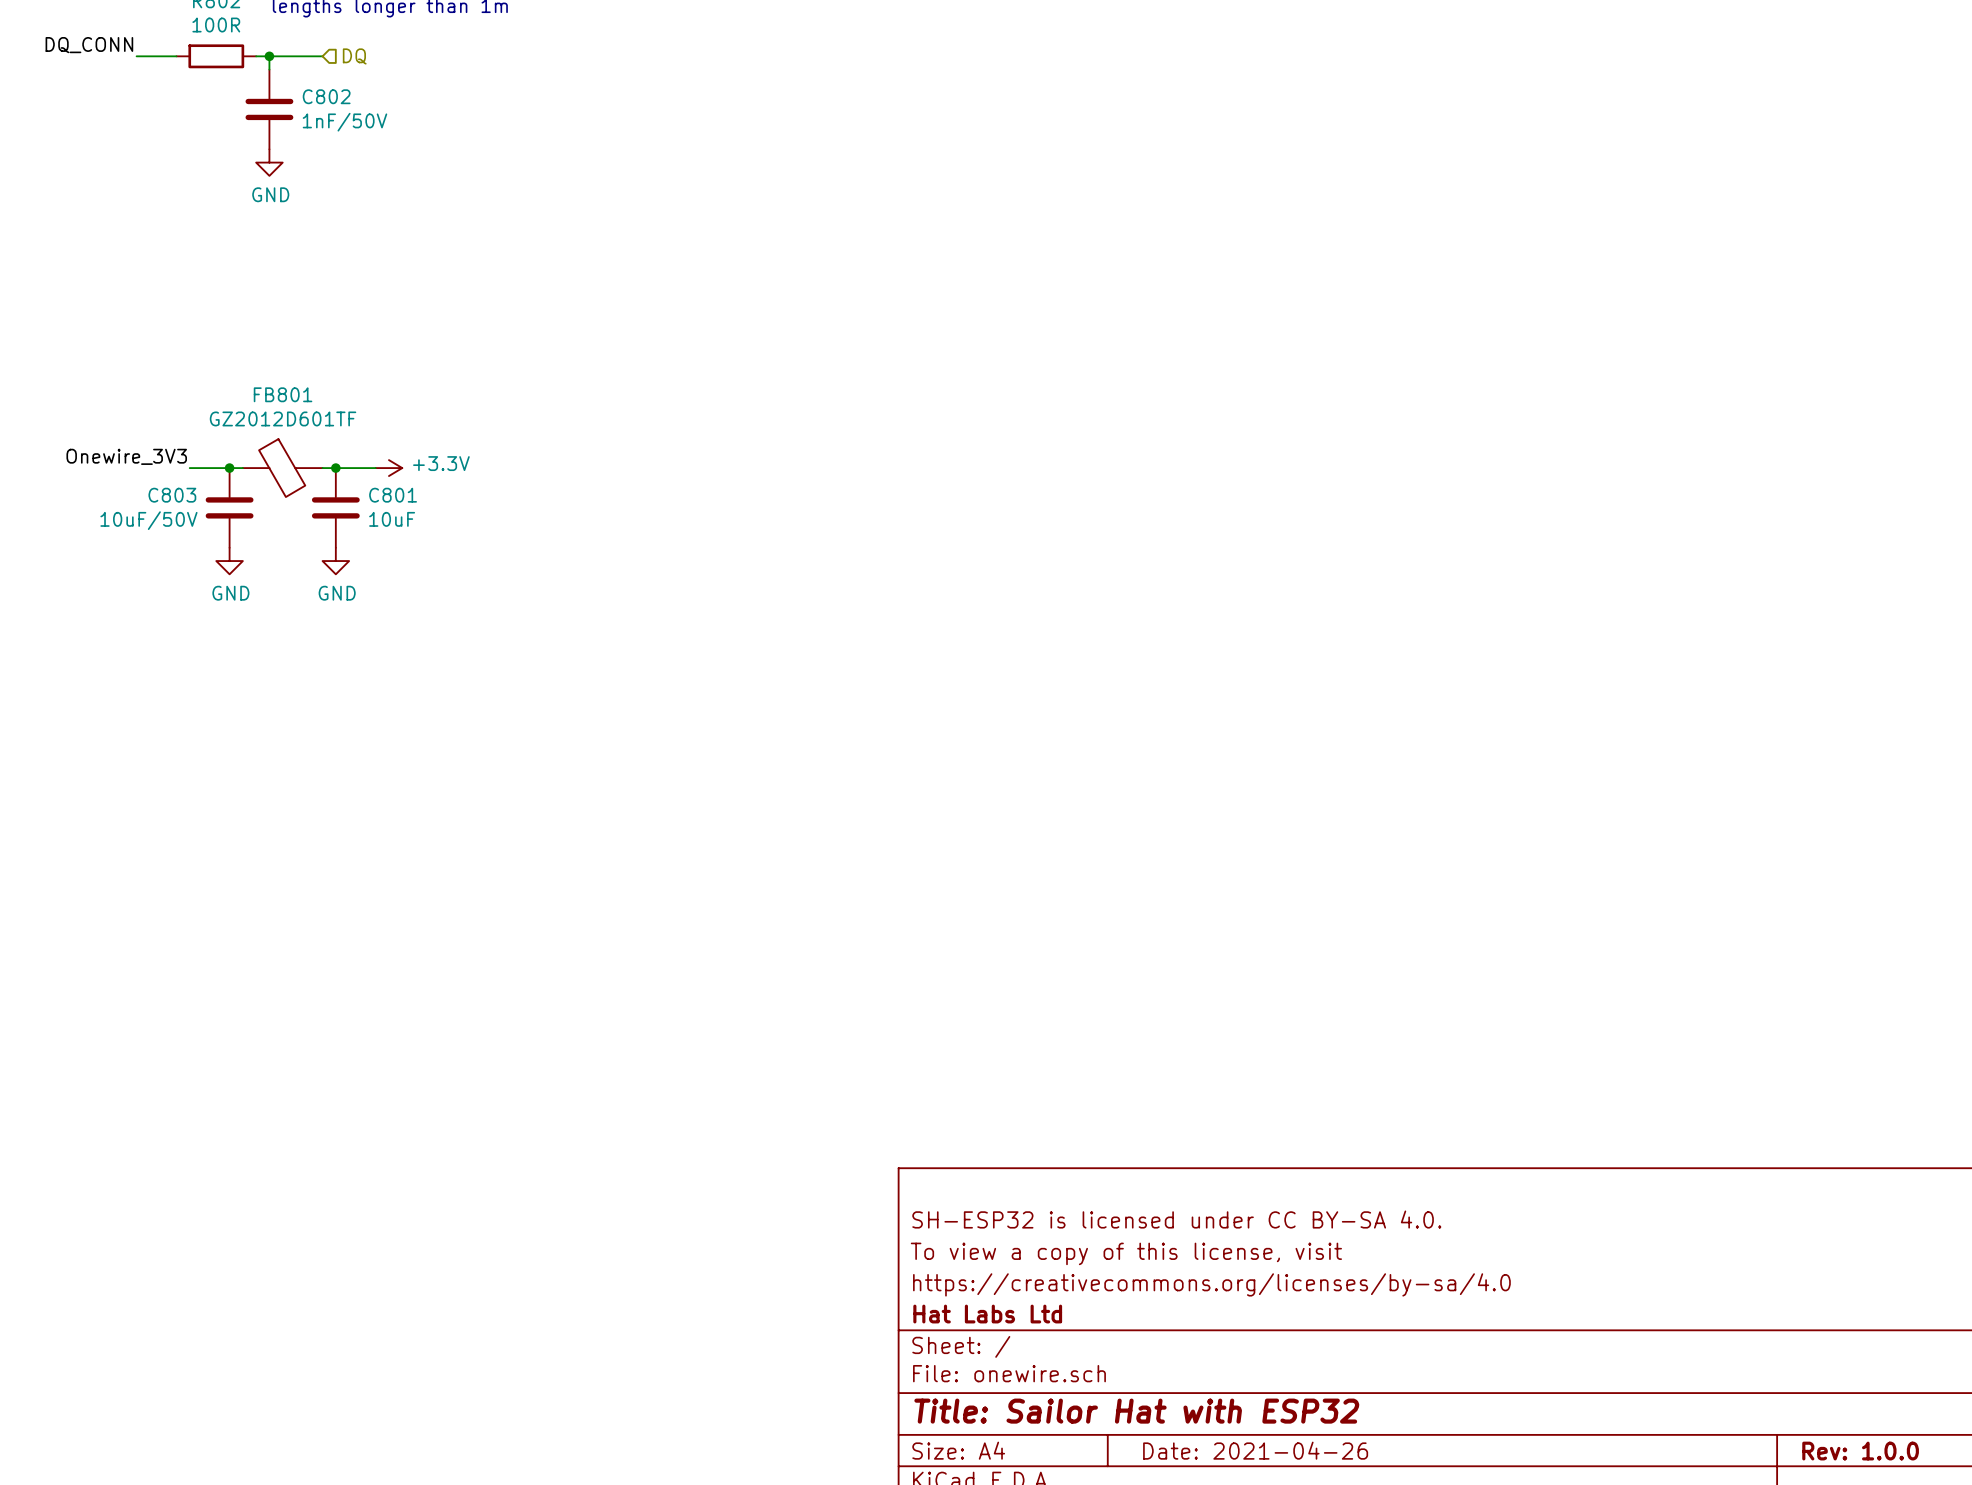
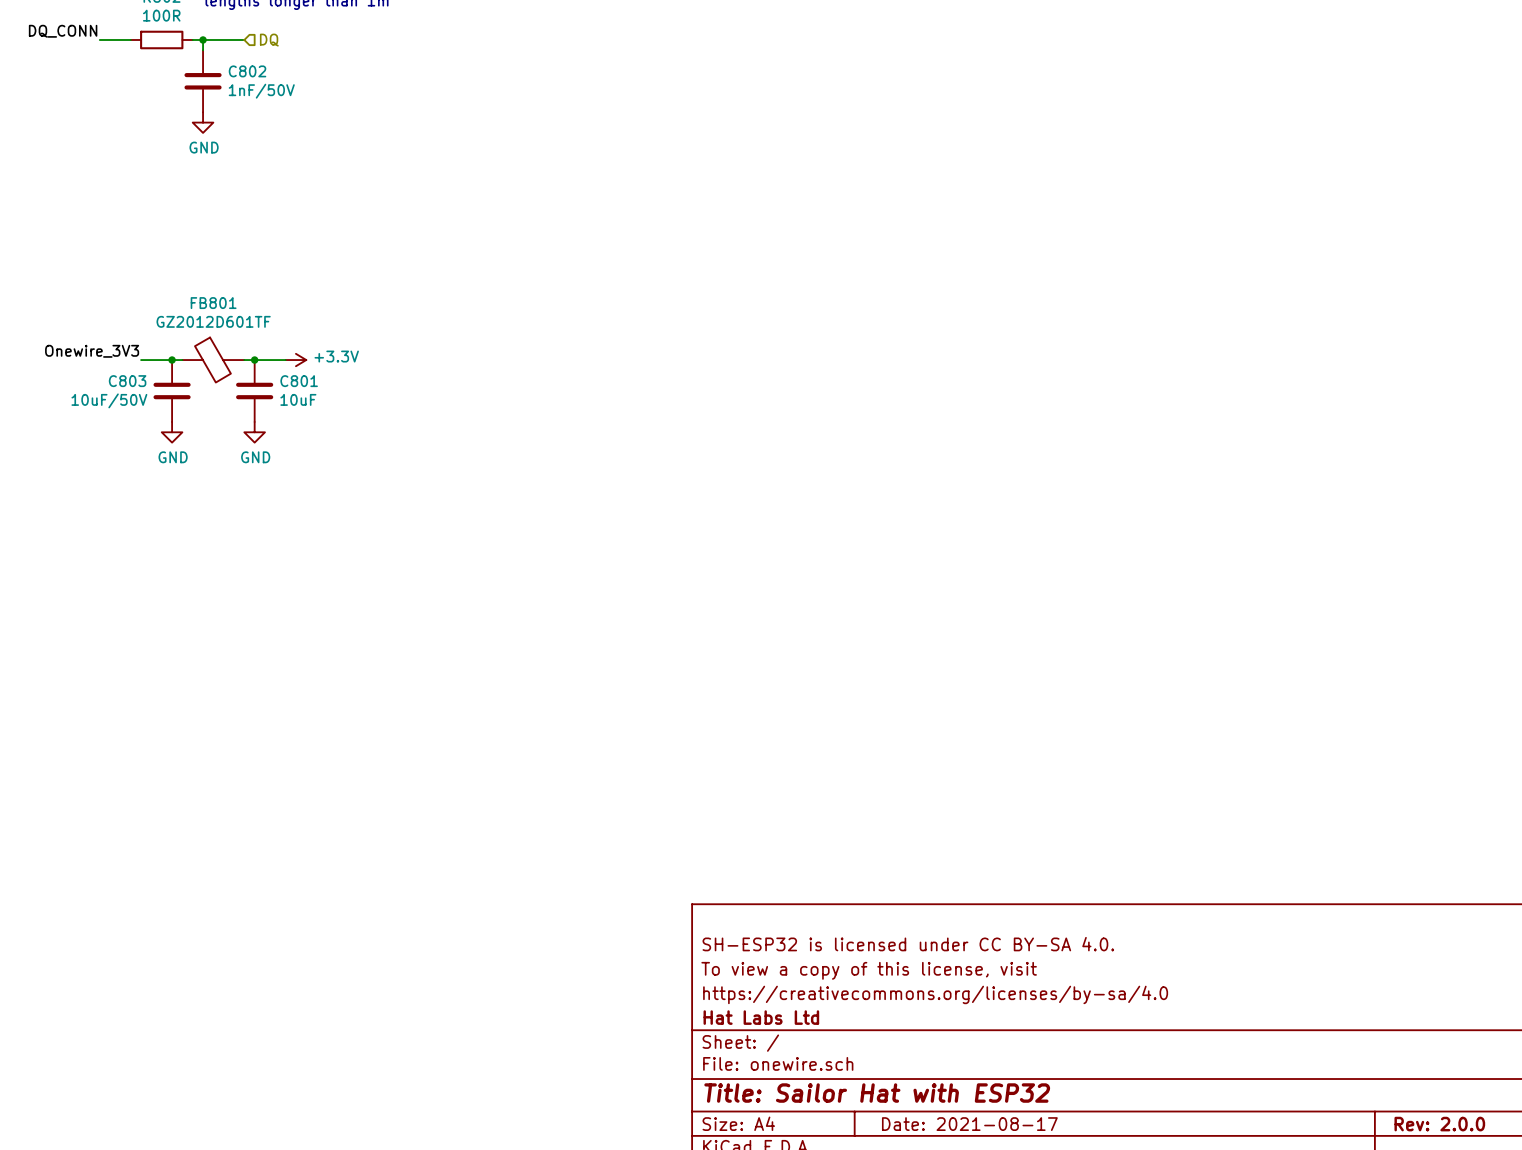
title block: Date: 2021-04-26 (1255, 1450) -> Date: 2021-08-17 (969, 1124)
title block: Rev: 1.0.0 (1860, 1451) -> Rev: 2.0.0 (1439, 1124)

